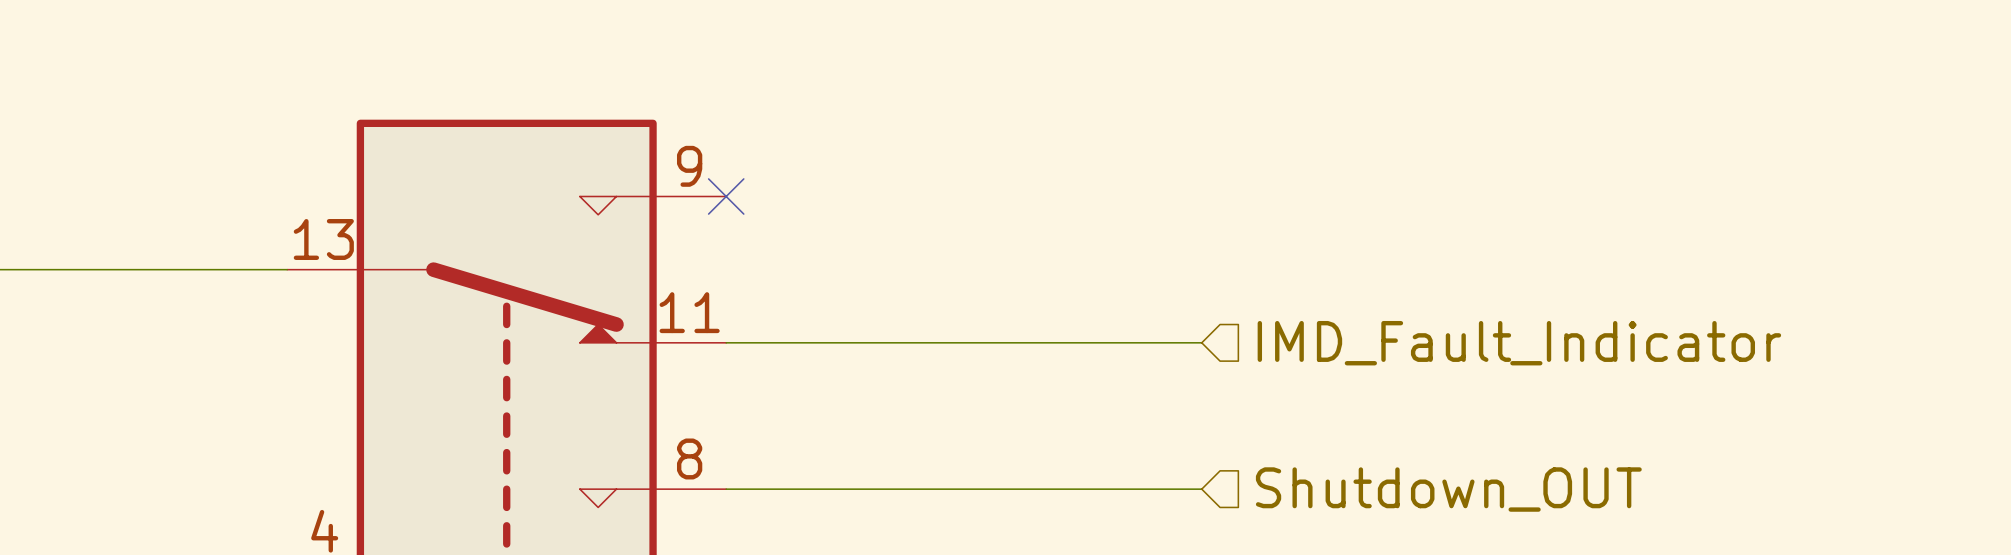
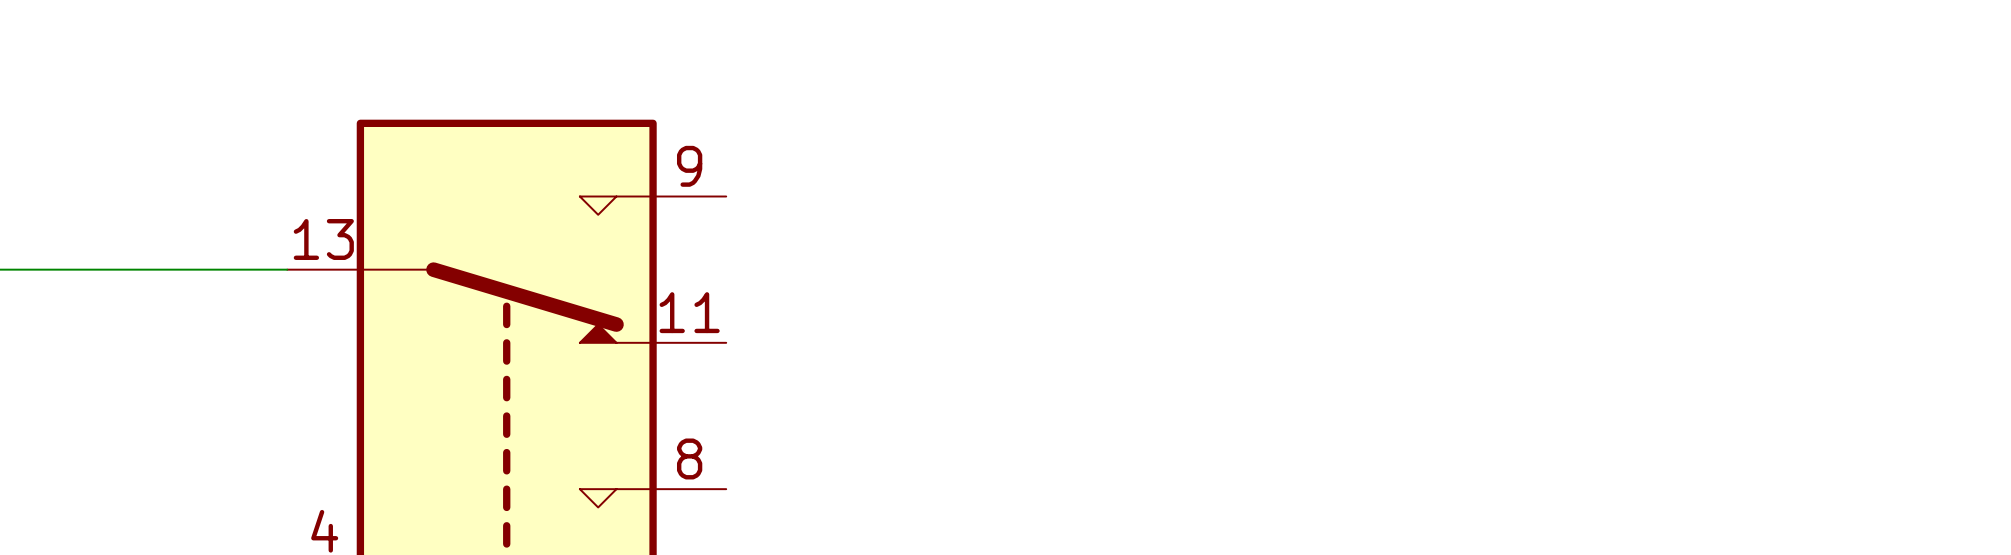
no-connect mark: (726, 196) -> none
wire: (726, 342) (1201, 342) -> none
hierarchical label: IMD_Fault_Indicator (1519, 343) -> none
wire: (726, 489) (1201, 489) -> none
hierarchical label: Shutdown_OUT (1448, 489) -> none

